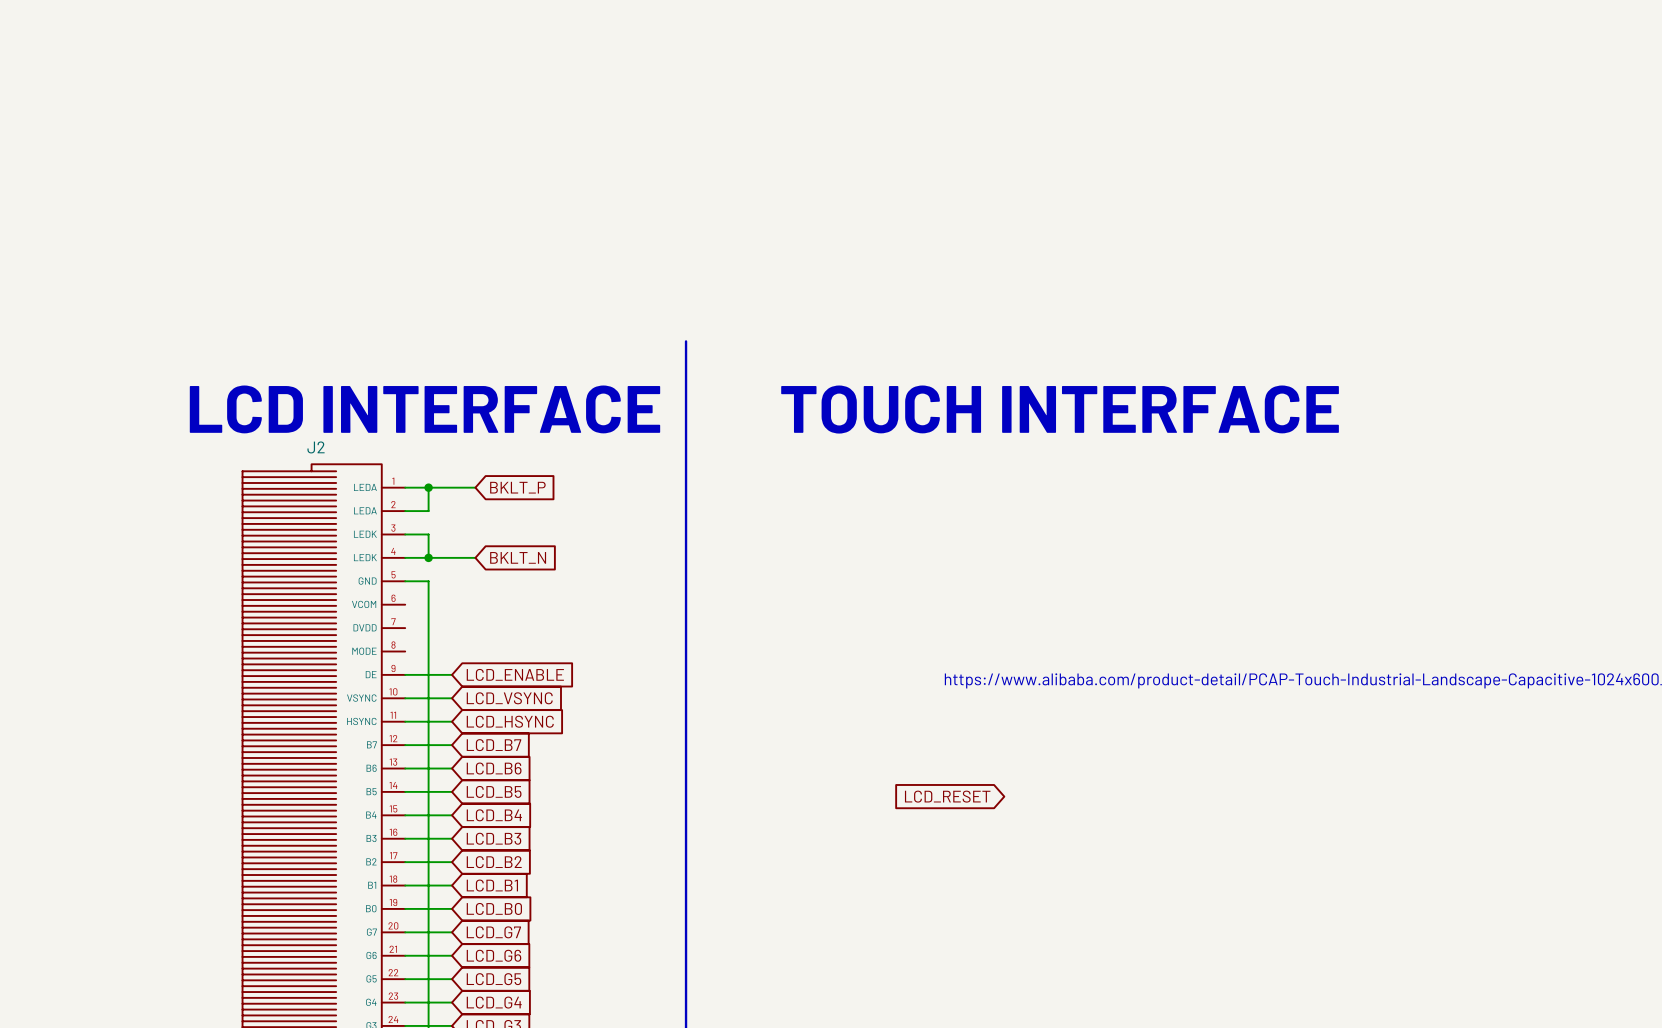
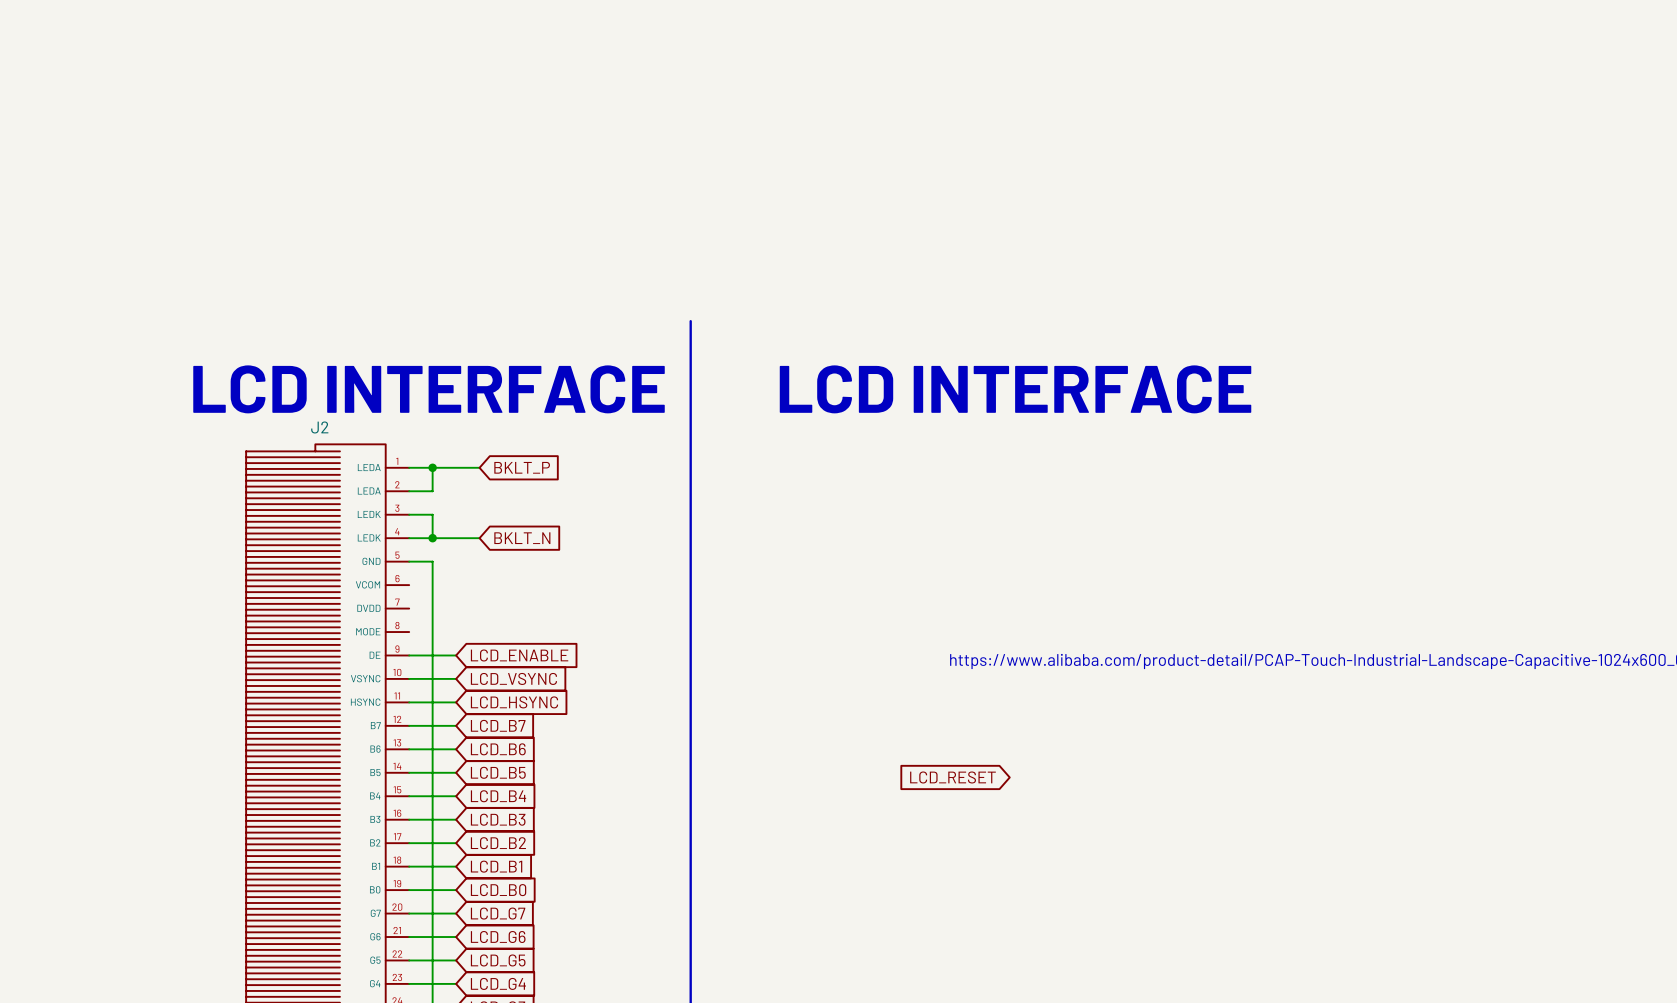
text: TOUCH INTERFACE (1060, 409) -> LCD INTERFACE (1015, 389)

